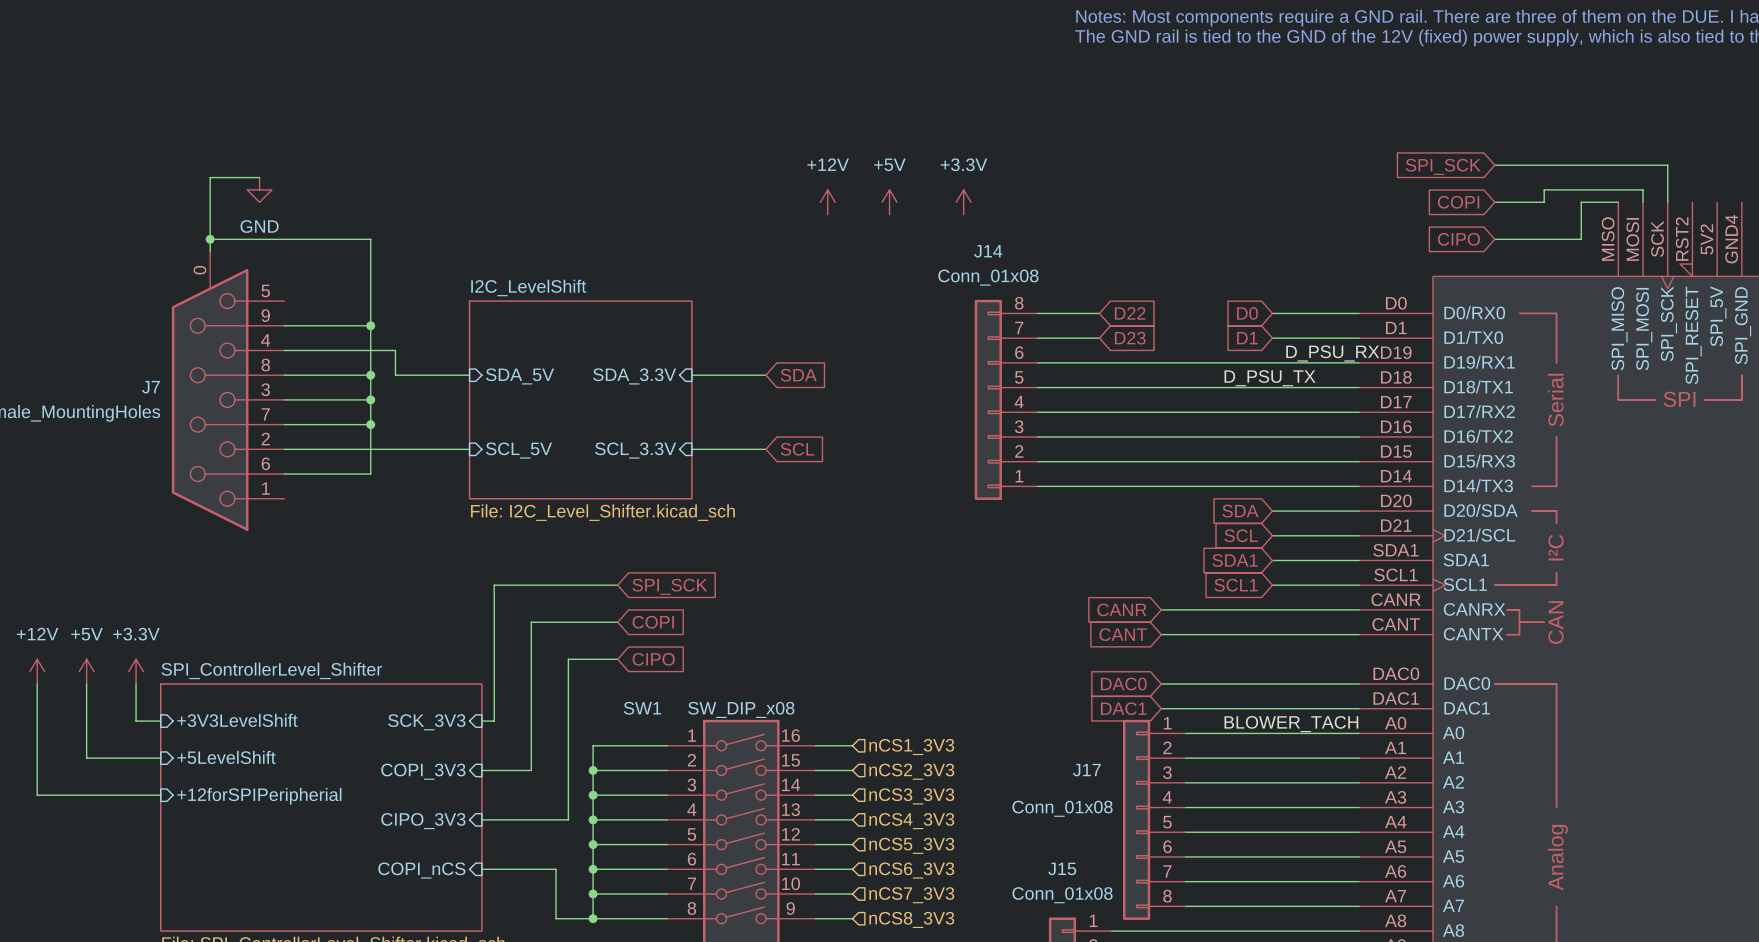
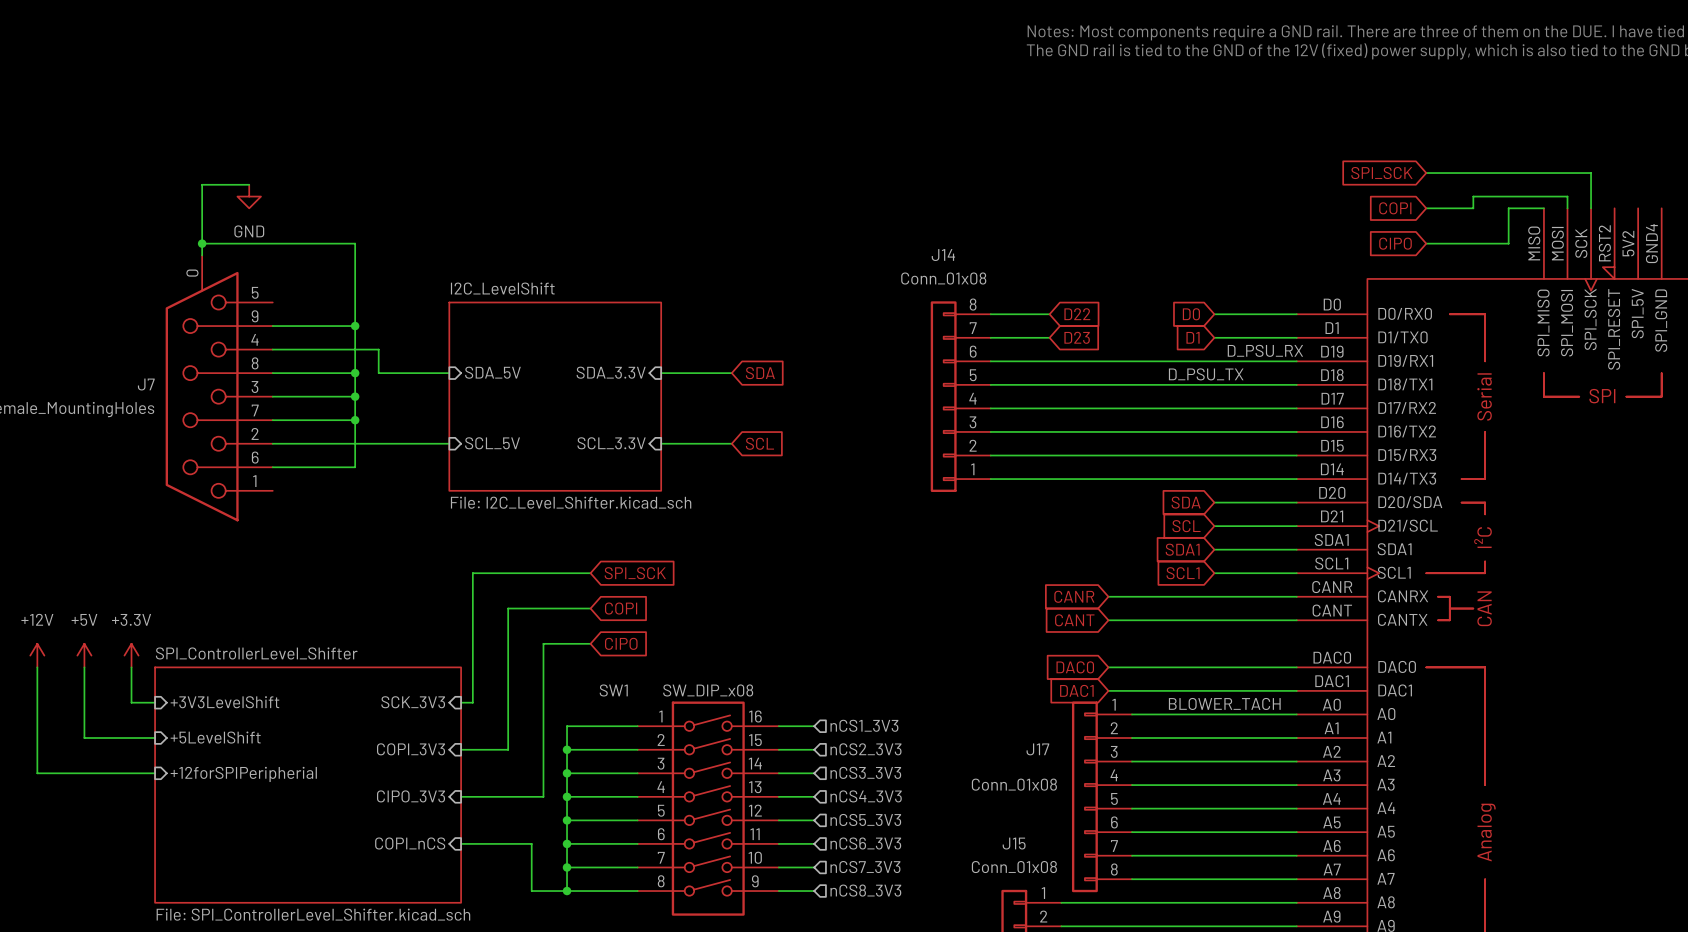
power symbol: +12V (827, 202) -> none
power symbol: +5V (889, 202) -> none
power symbol: +3.3V (963, 202) -> none

